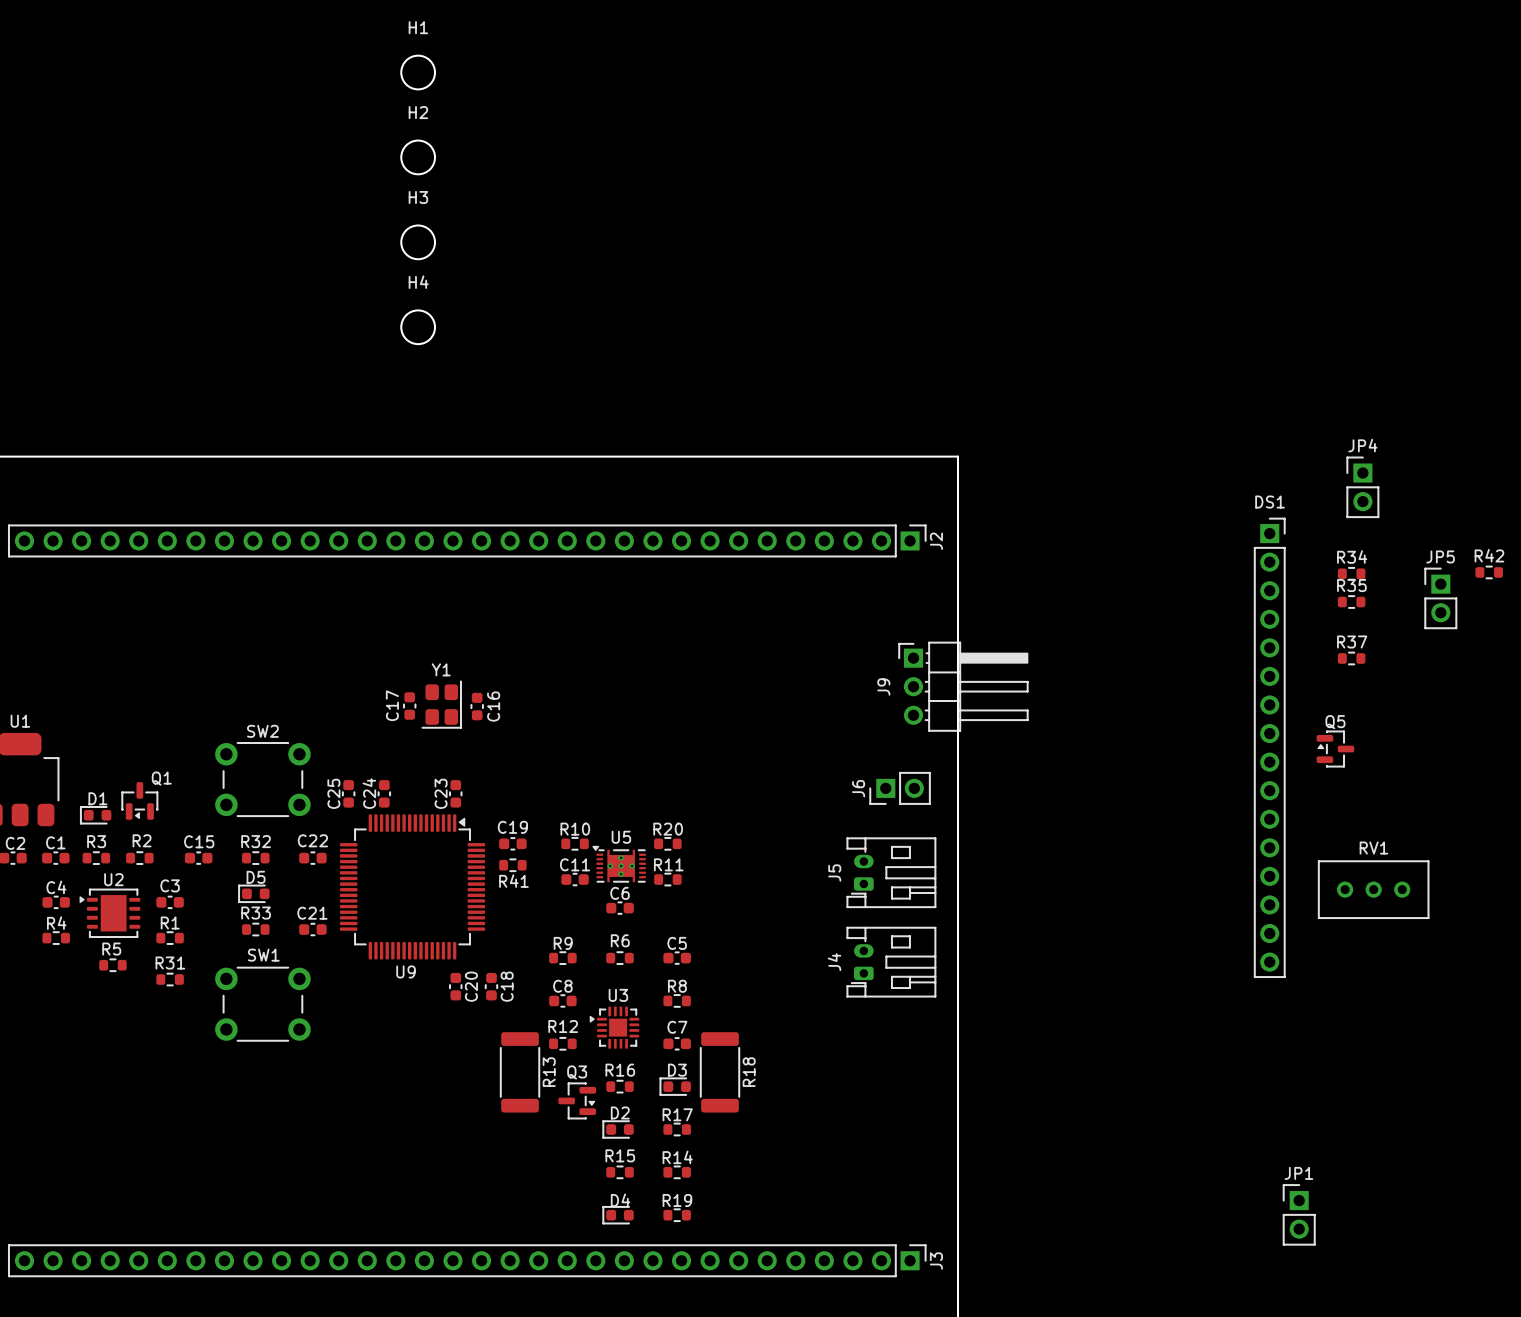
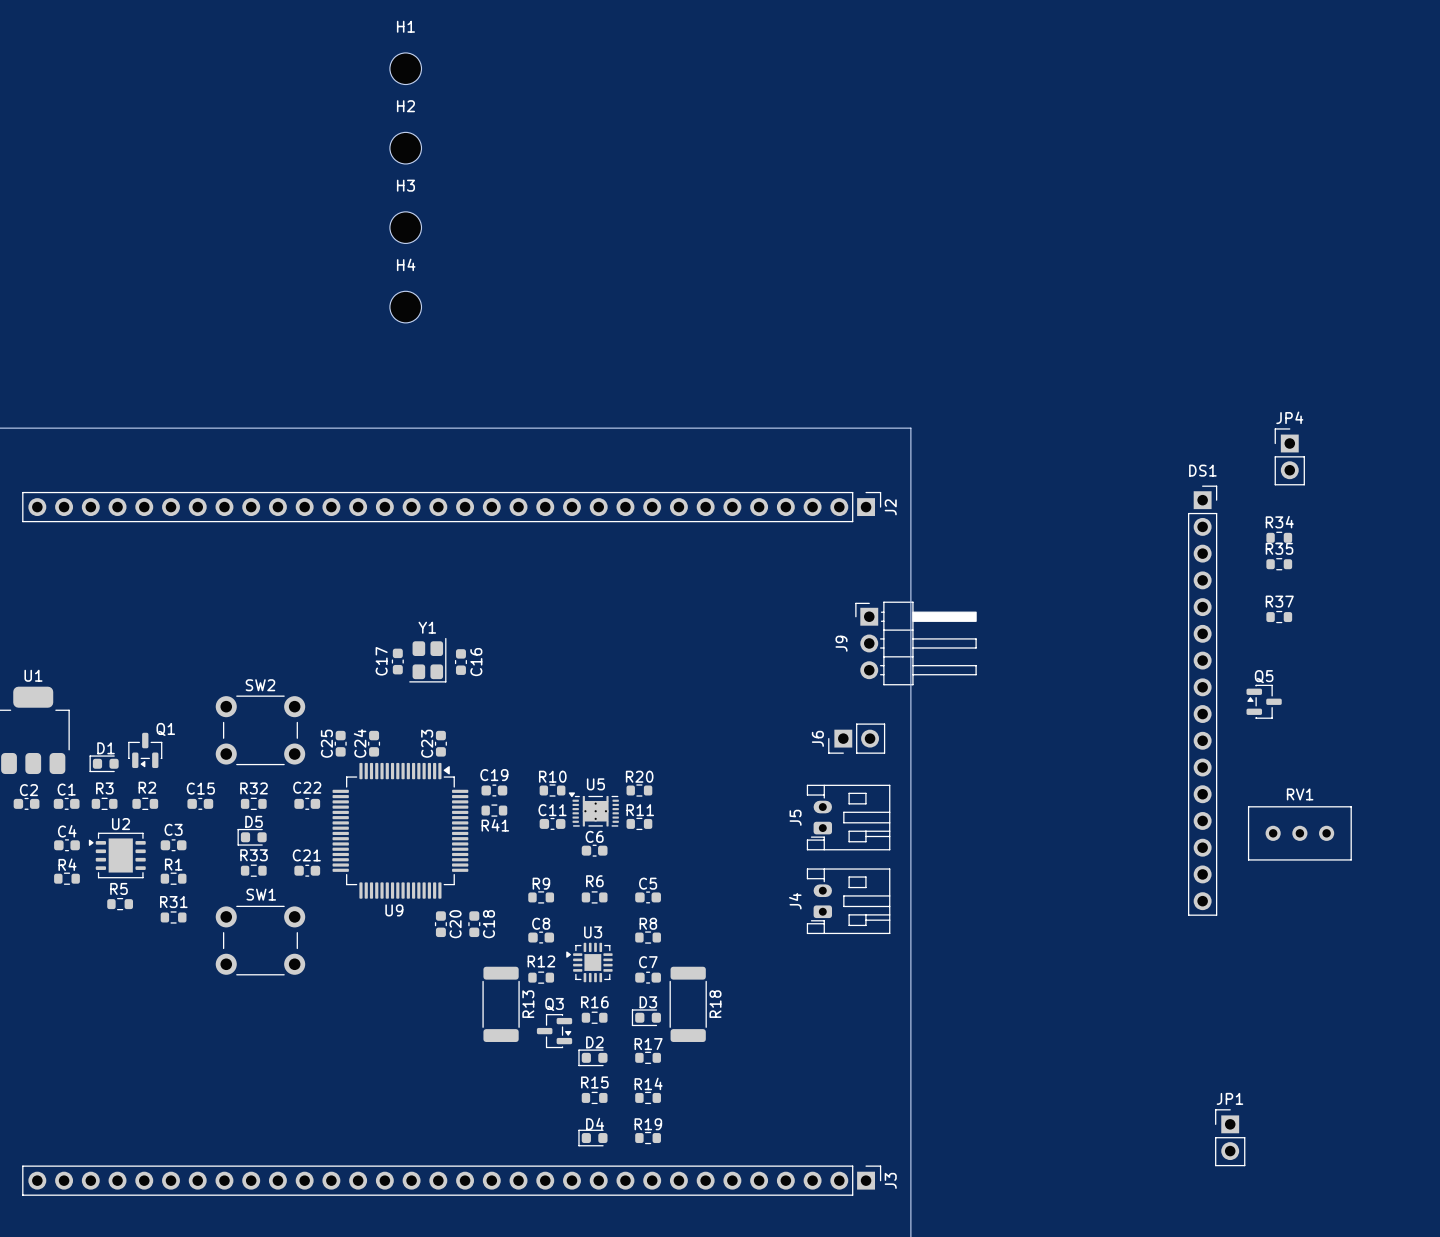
R42: (1489, 572) -> none
JP5: (1440, 598) -> none

